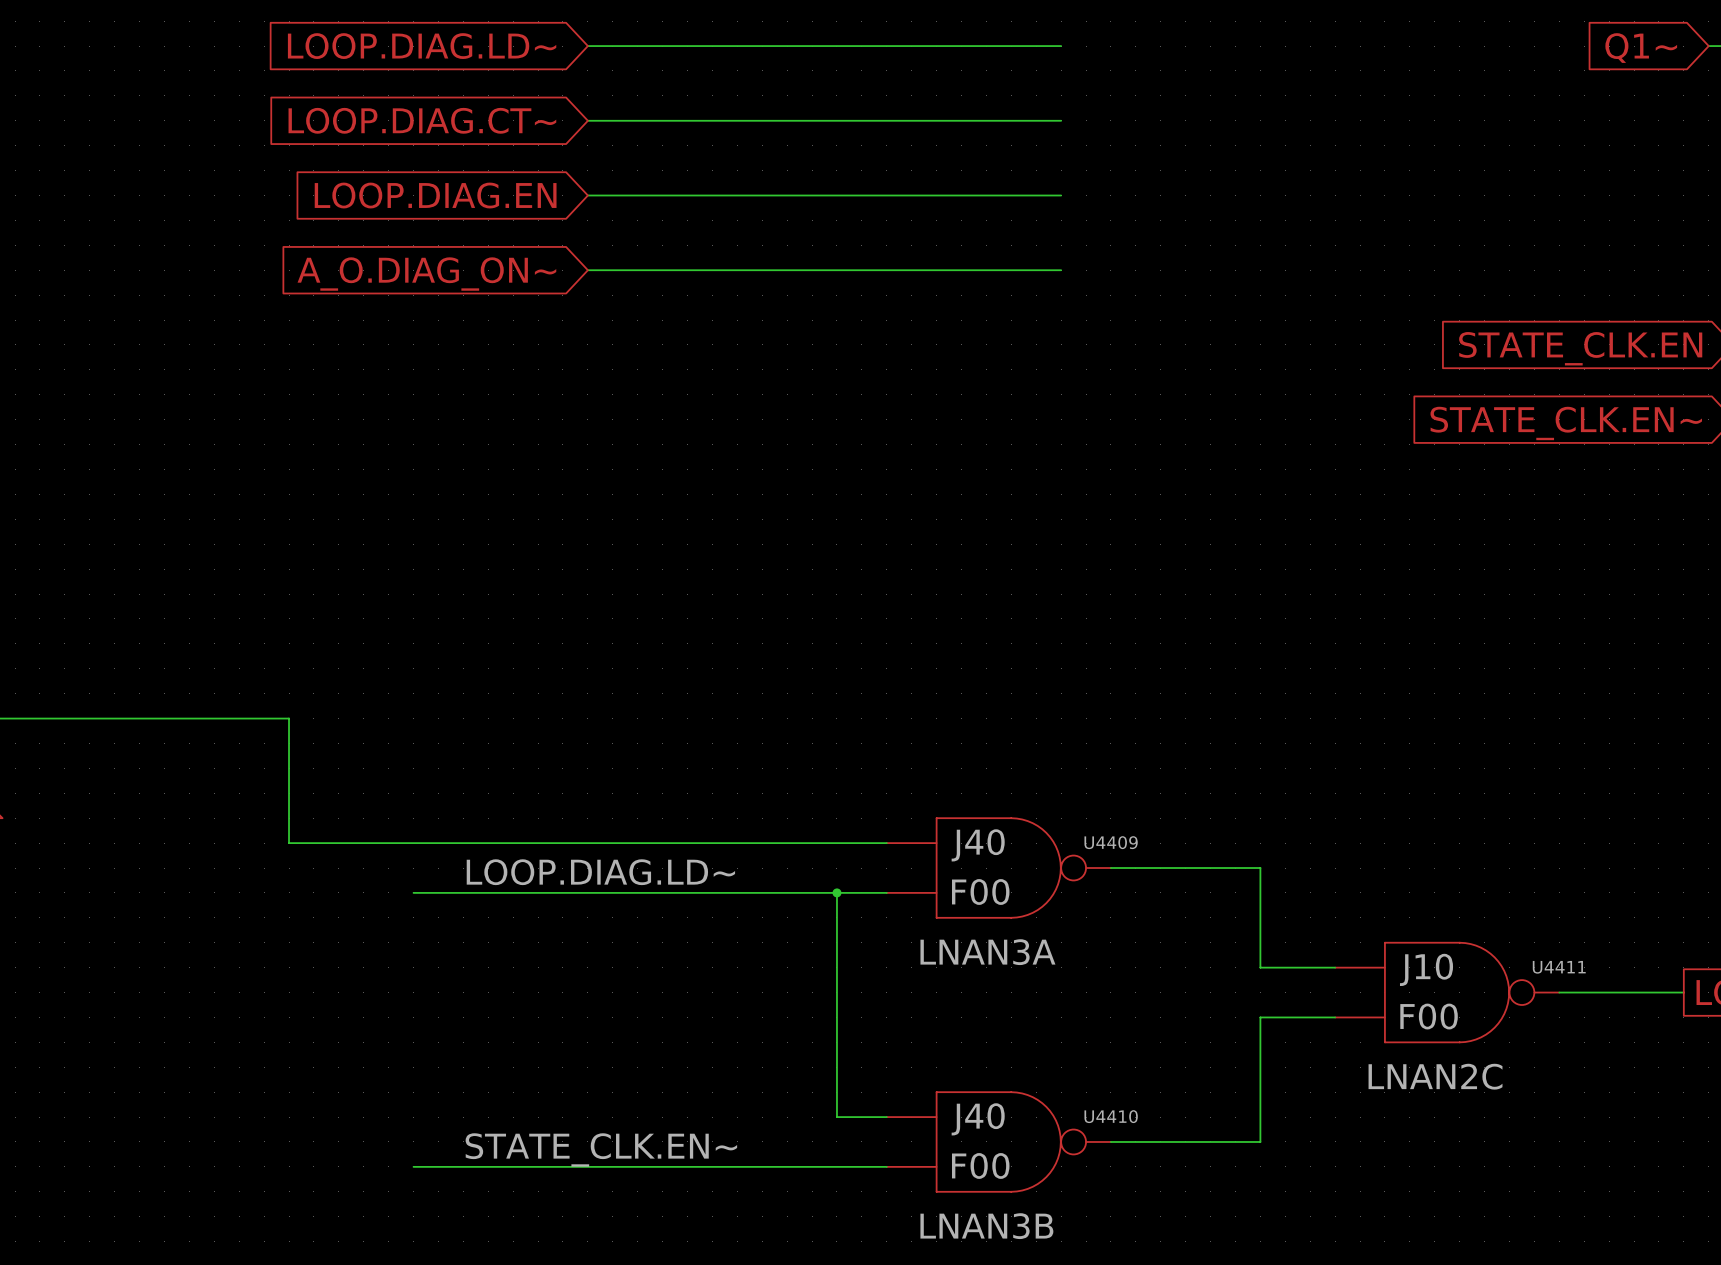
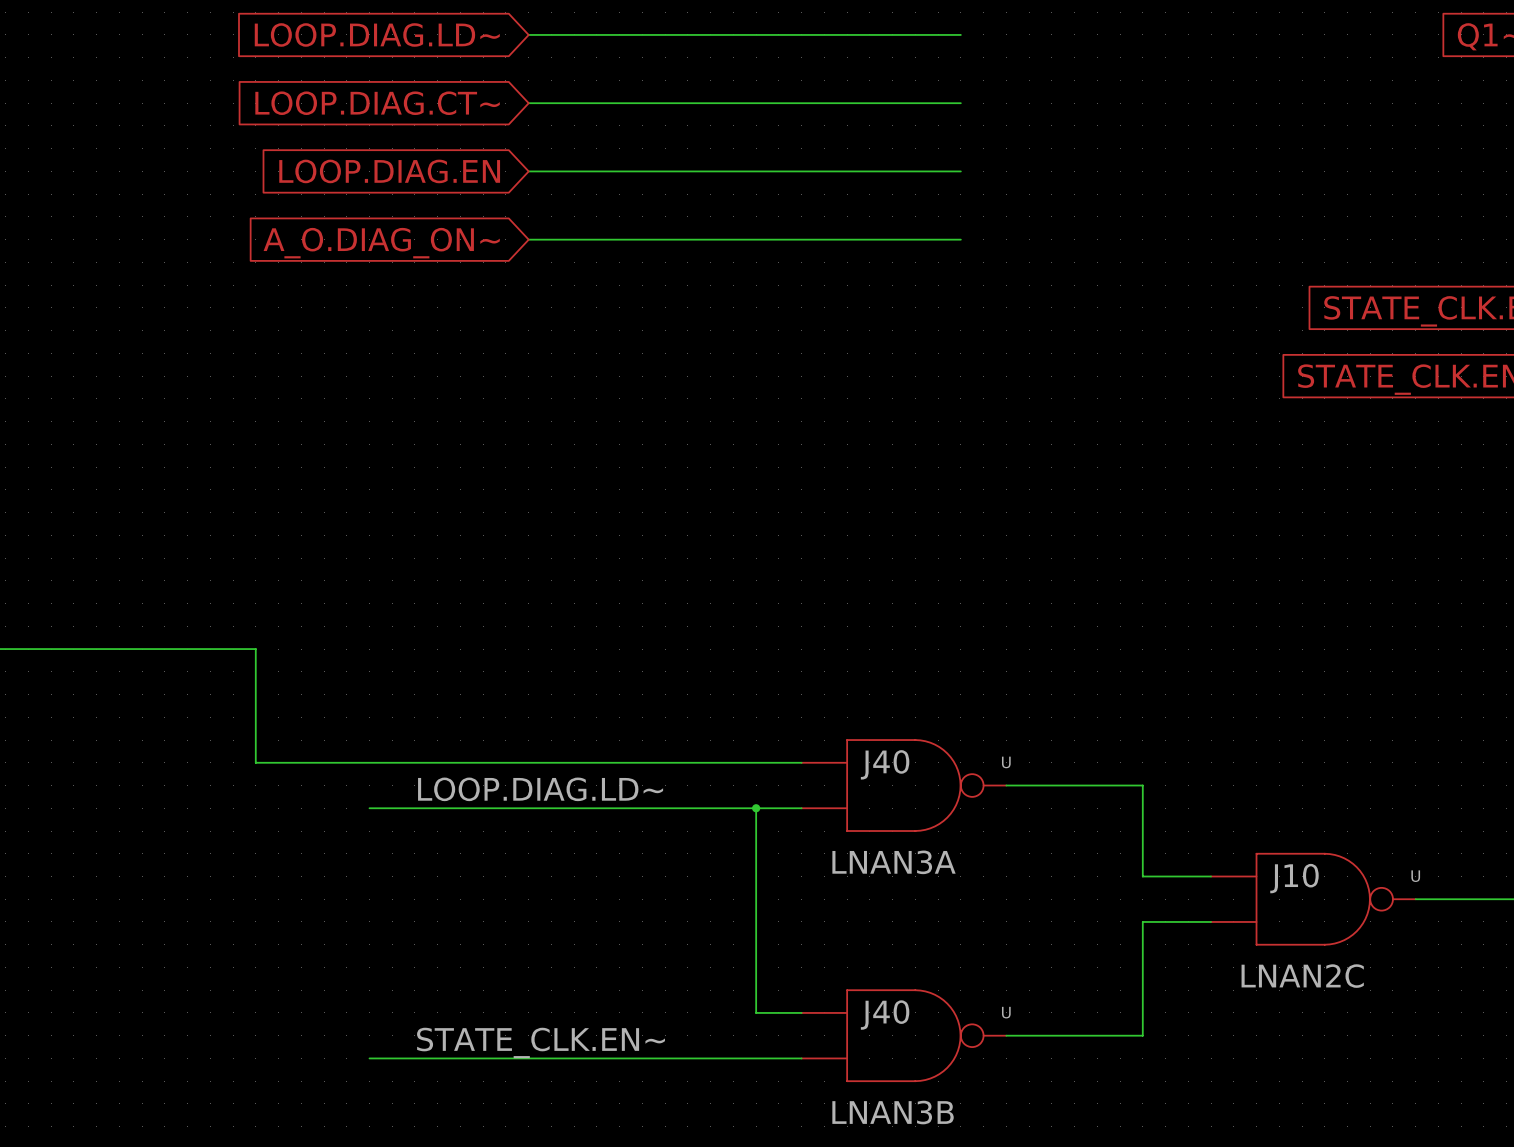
U4409 name: U4409 (1111, 842) -> U (1006, 762)
U4409 value: F00 (980, 892) -> none
U4411 name: U4411 (1559, 967) -> U (1415, 876)
U4411 value: F00 (1429, 1016) -> none
U4410 name: U4410 (1111, 1116) -> U (1006, 1012)
U4410 value: F00 (980, 1165) -> none

